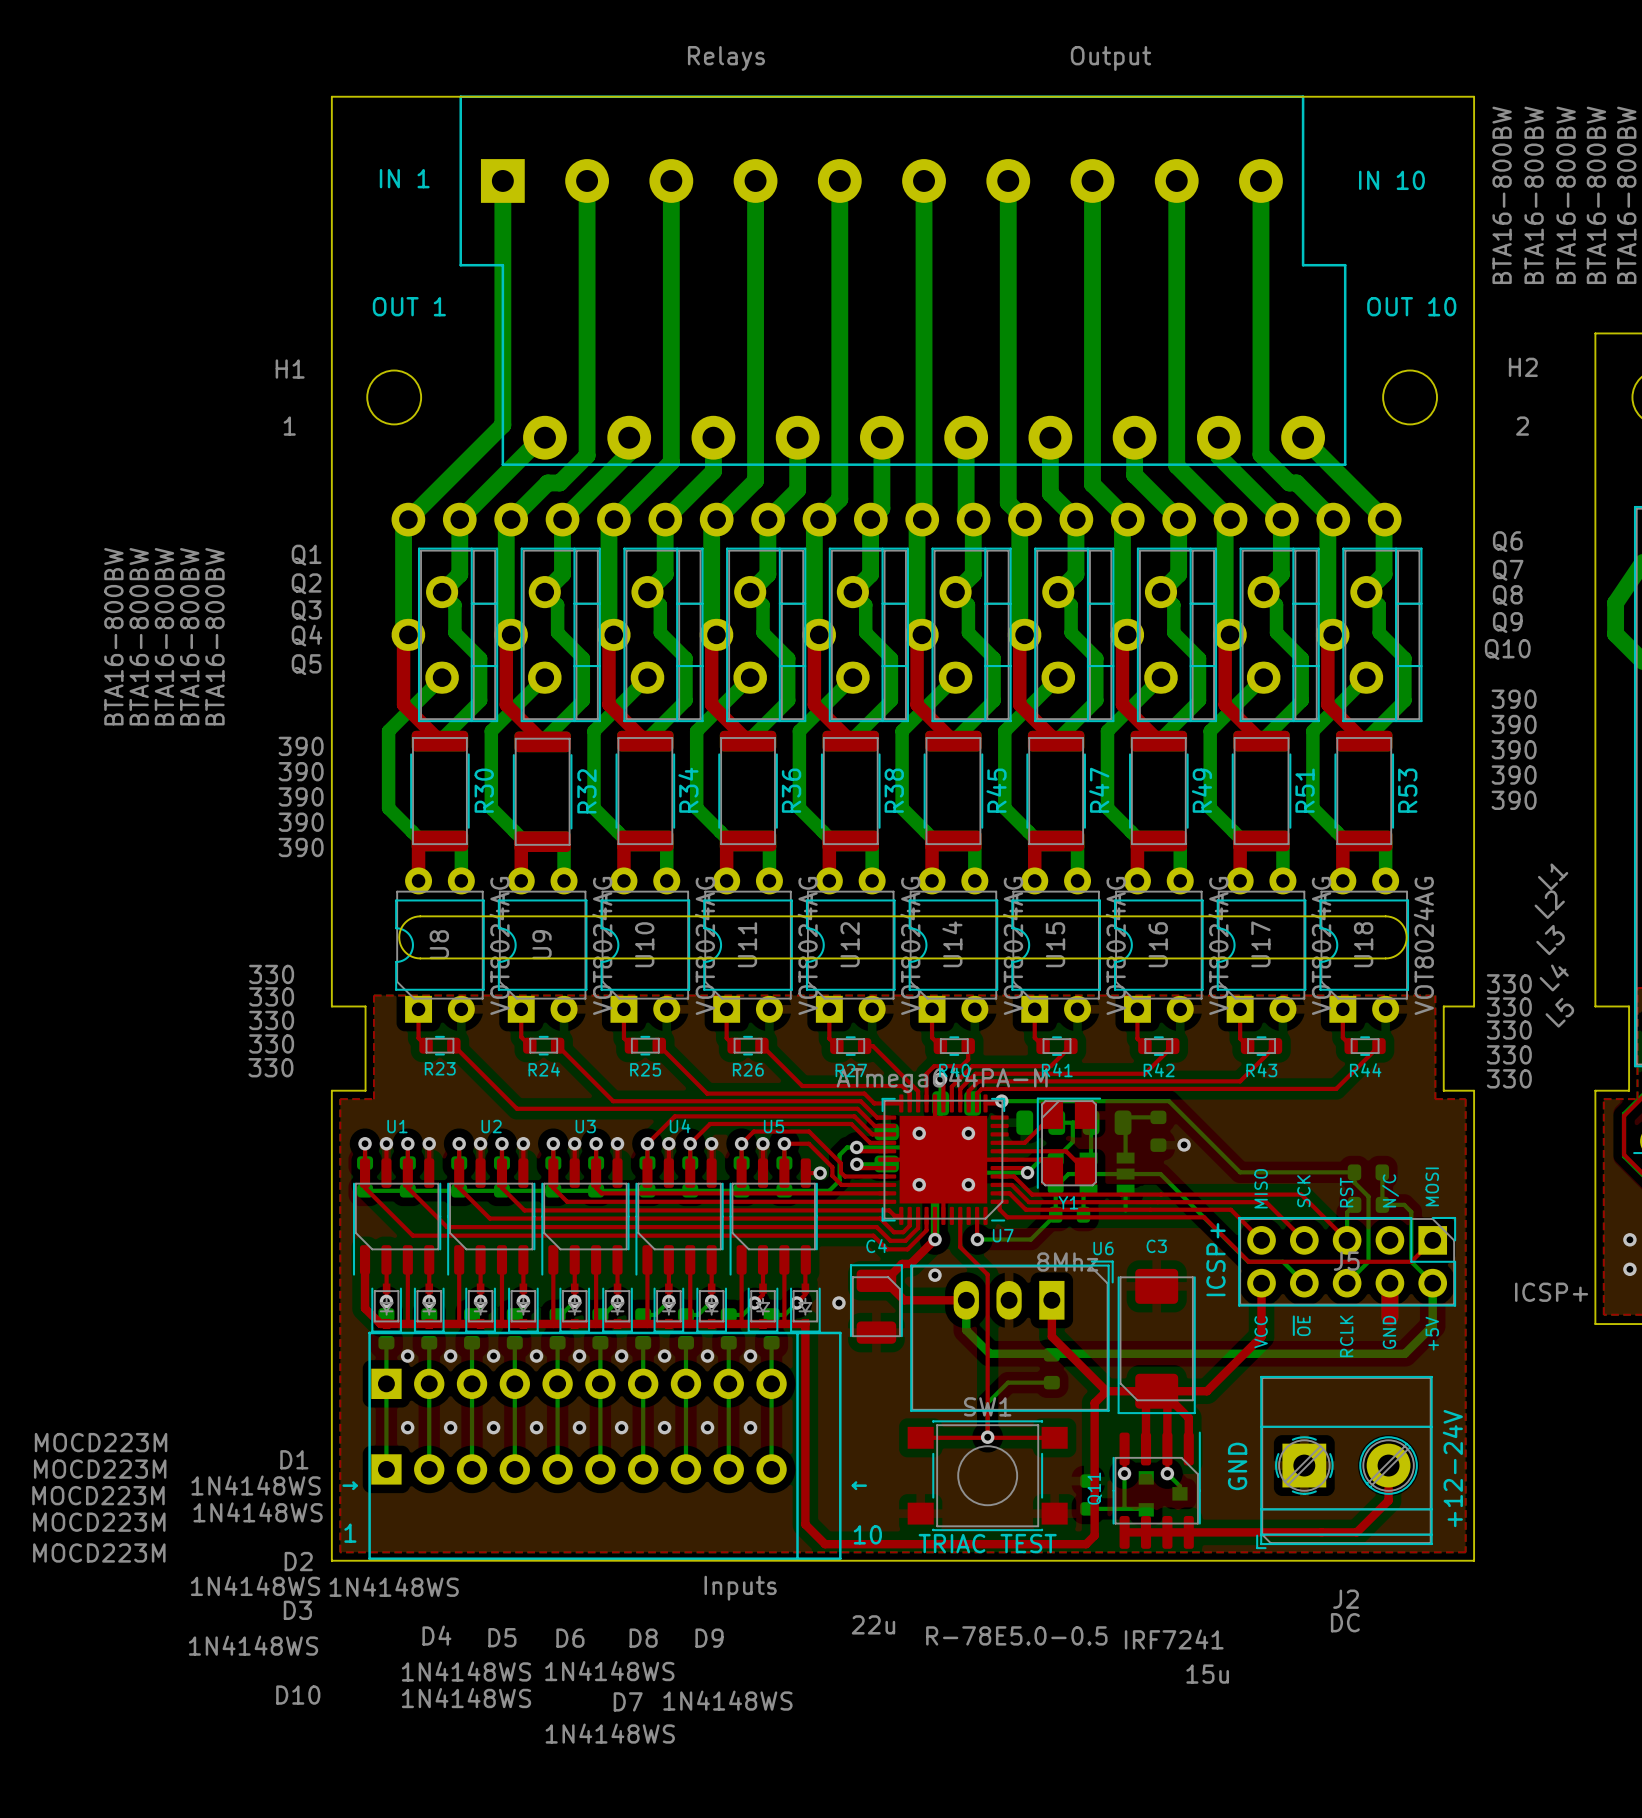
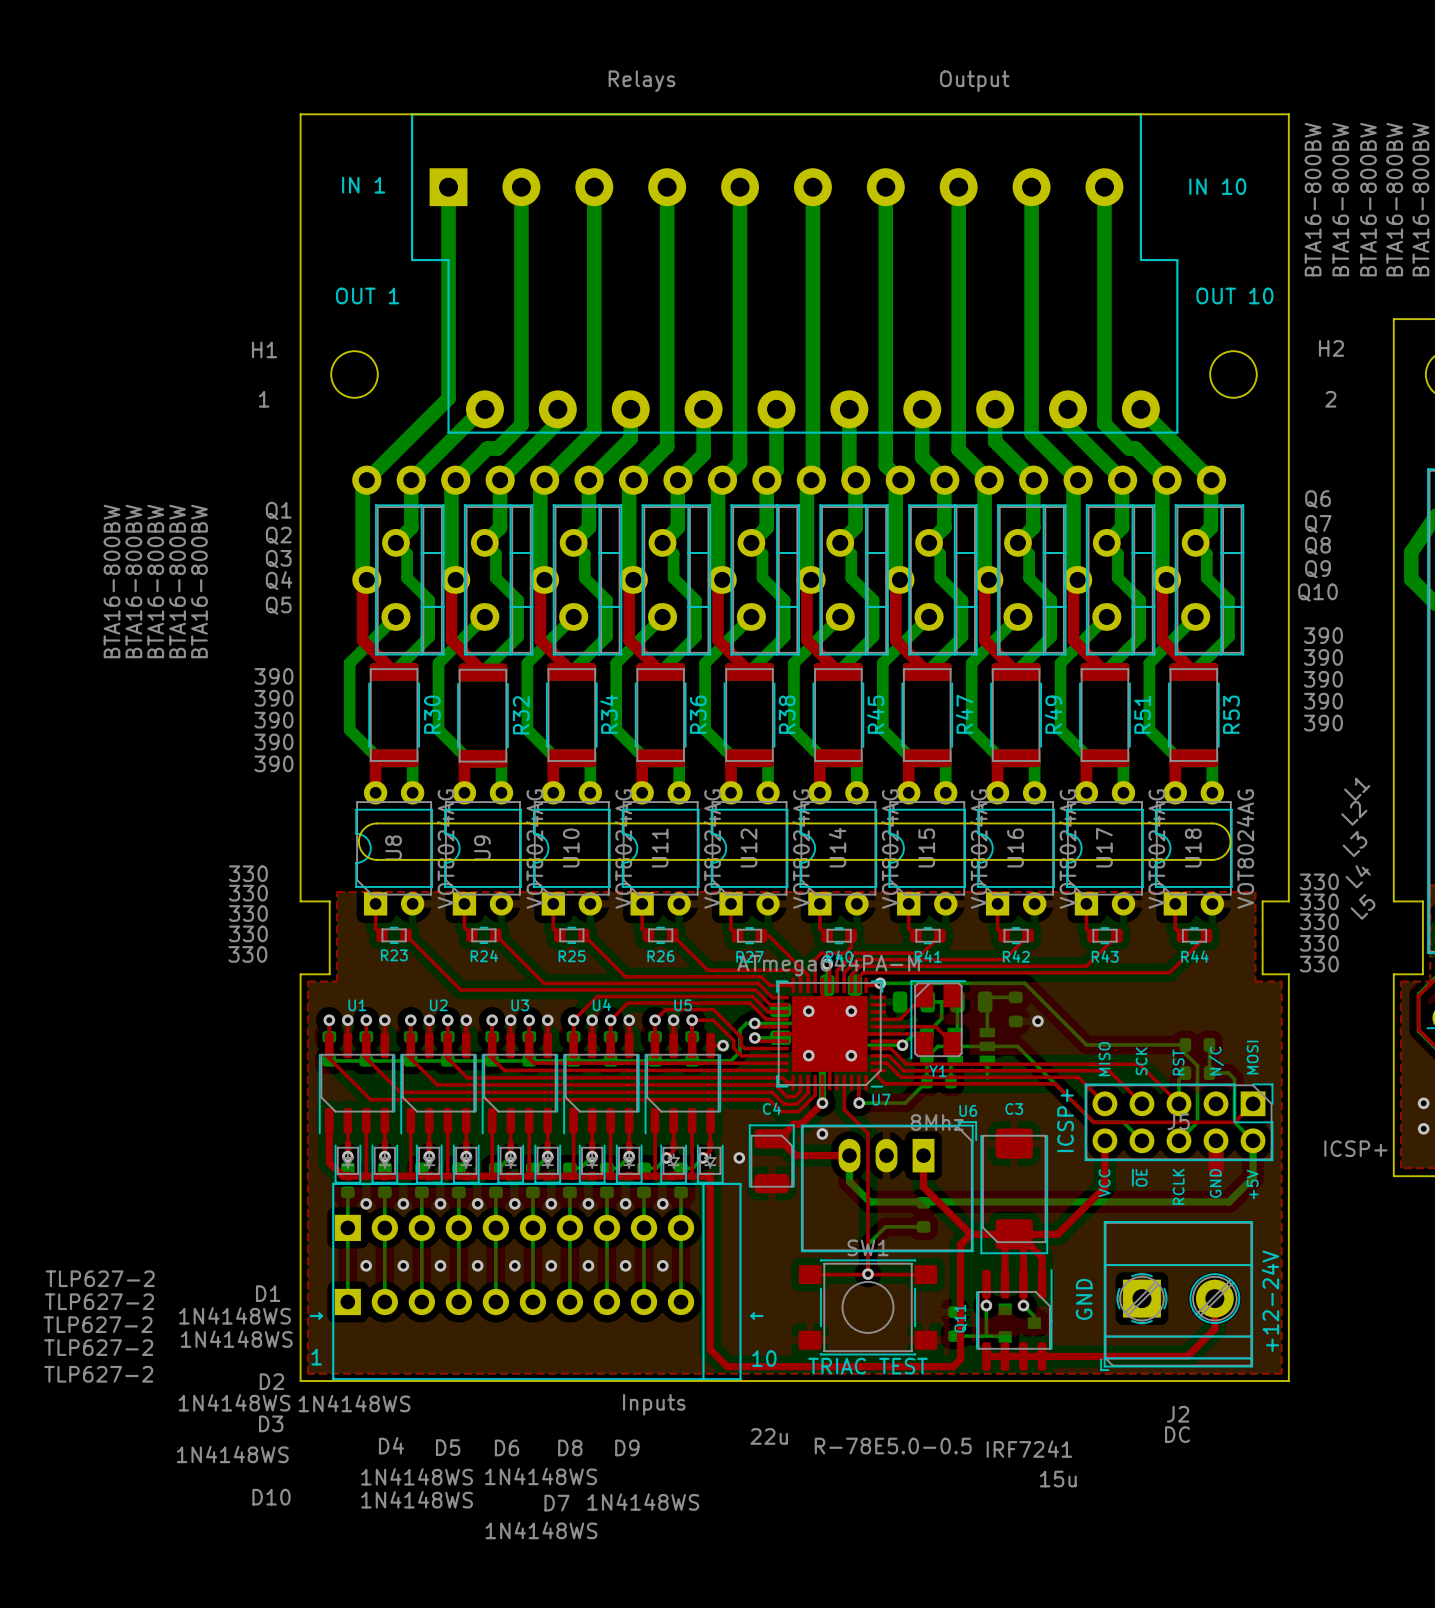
U1 value: MOCD223M (101, 1442) -> TLP627-2 (100, 1278)
U2 value: MOCD223M (100, 1469) -> TLP627-2 (99, 1301)
U3 value: MOCD223M (98, 1495) -> TLP627-2 (97, 1324)
U4 value: MOCD223M (99, 1522) -> TLP627-2 (98, 1347)
U5 value: MOCD223M (99, 1552) -> TLP627-2 (98, 1374)

